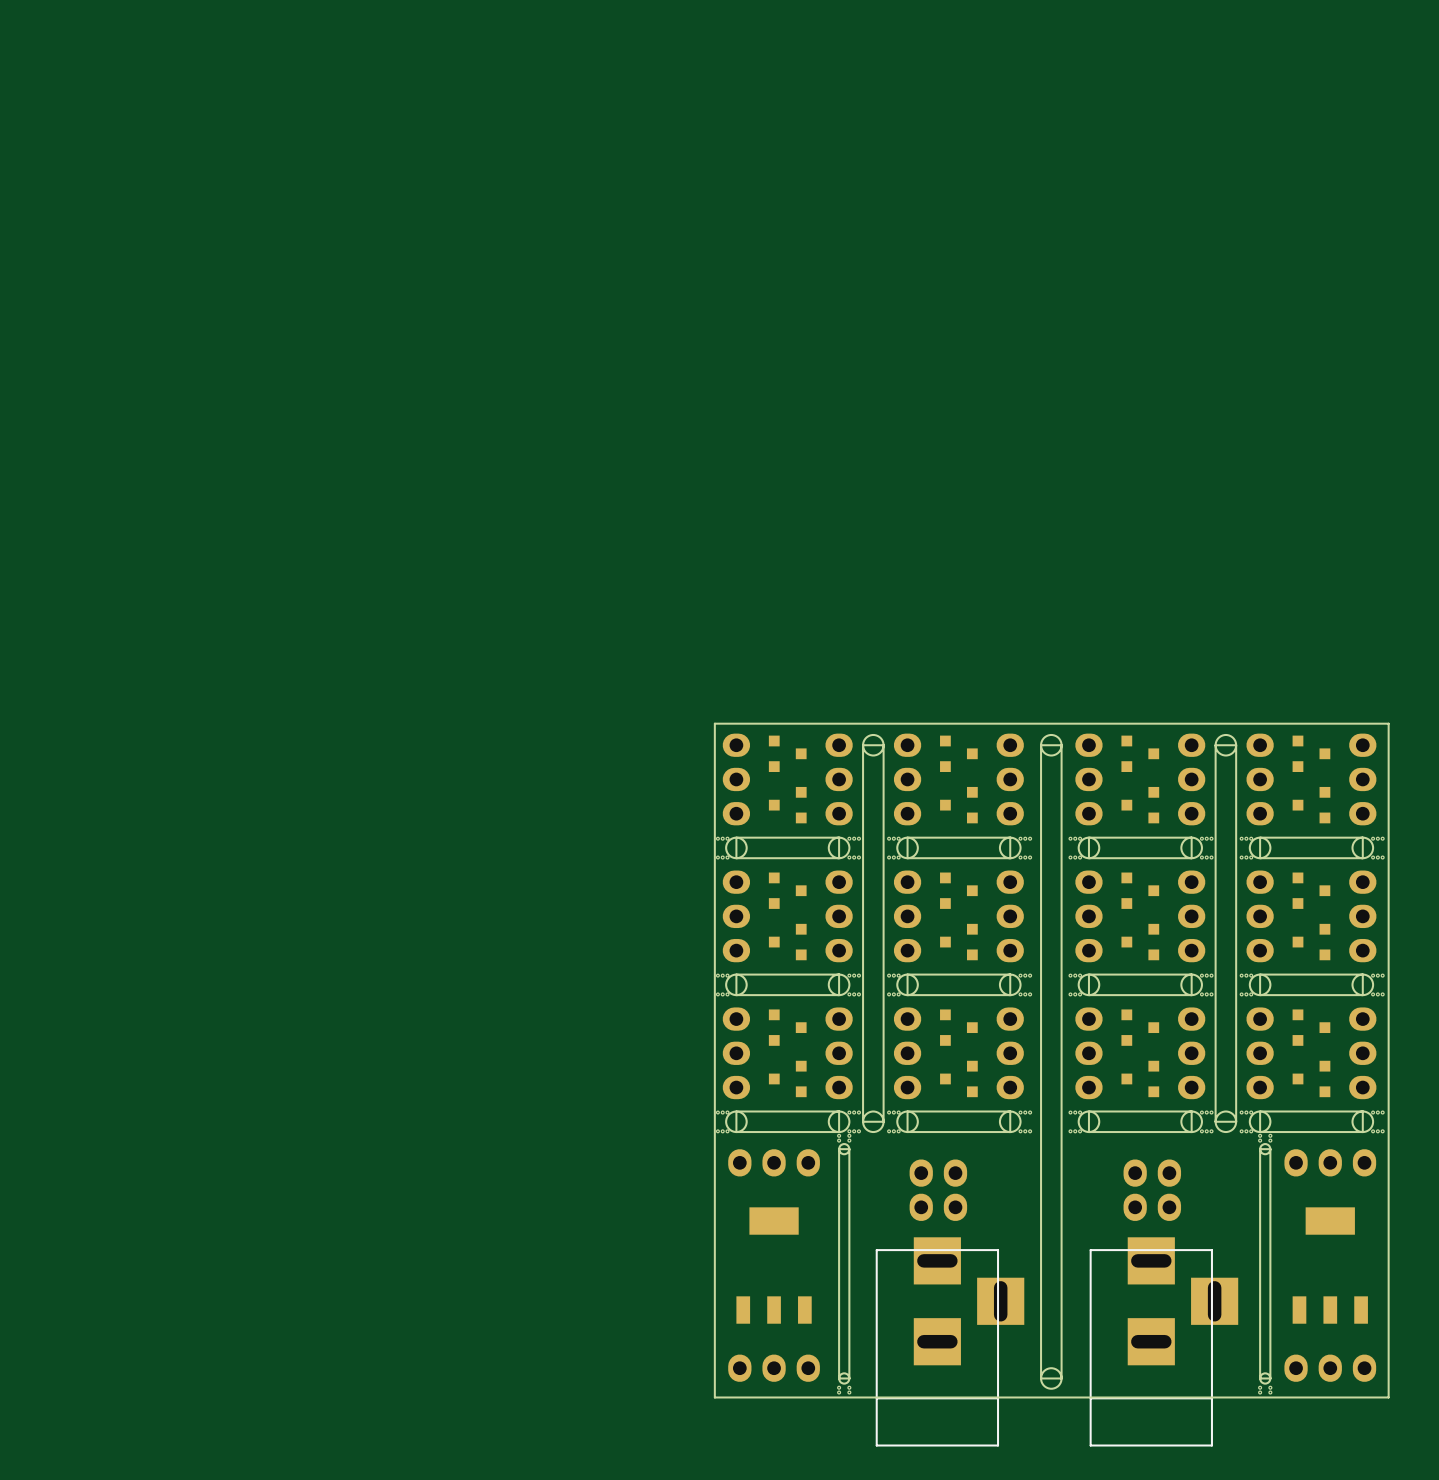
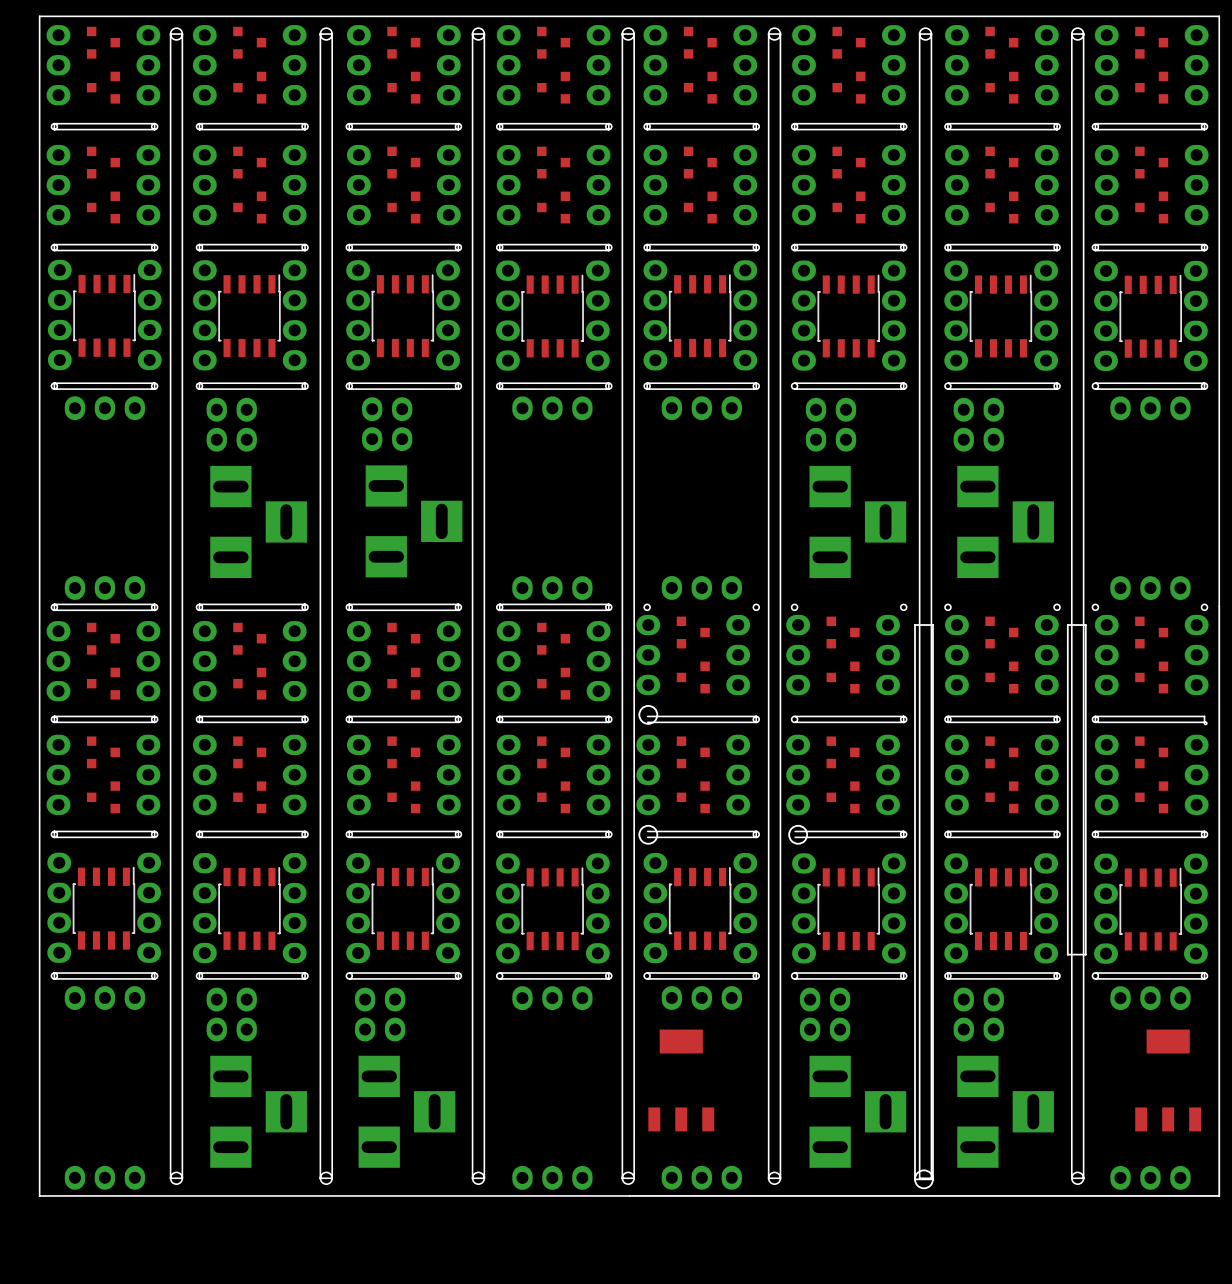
round board edge: none -> [169, 27, 183, 41]
round board edge: none -> [319, 27, 333, 41]
round board edge: none -> [471, 27, 485, 41]
round board edge: none -> [621, 27, 635, 41]
round board edge: none -> [768, 27, 782, 41]
round board edge: none -> [919, 27, 933, 41]
round board edge: none -> [1071, 27, 1085, 41]
board edge: none -> (170, 34) (182, 34) (182, 1178) (170, 1178) (170, 34)
board edge: none -> (320, 34) (332, 34) (332, 1178) (320, 1178) (320, 34)
board edge: none -> (472, 34) (484, 34) (484, 1178) (472, 1178) (472, 34)
board edge: none -> (622, 34) (634, 34) (634, 1178) (622, 1178) (622, 34)
board edge: none -> (768, 34) (780, 34) (780, 1178) (768, 1178) (768, 34)
board edge: none -> (919, 34) (931, 34) (931, 1178) (919, 1178) (919, 34)
board edge: none -> (1071, 34) (1083, 34) (1083, 1178) (1071, 1178) (1071, 34)
part: none -> (103, 42)
part: none -> (249, 42)
part: none -> (403, 42)
part: none -> (553, 42)
part: none -> (700, 42)
part: none -> (848, 42)
part: none -> (1001, 42)
part: none -> (1151, 42)
part: none -> (58, 65)
part: none -> (148, 65)
part: none -> (204, 65)
part: none -> (294, 65)
part: none -> (358, 65)
part: none -> (448, 65)
part: none -> (508, 65)
part: none -> (598, 65)
part: none -> (655, 65)
part: none -> (745, 65)
part: none -> (804, 65)
part: none -> (893, 65)
part: none -> (956, 65)
part: none -> (1046, 65)
part: none -> (1106, 65)
part: none -> (1196, 65)
part: none -> (103, 87)
part: none -> (249, 87)
part: none -> (403, 87)
part: none -> (553, 87)
part: none -> (700, 87)
part: none -> (848, 87)
part: none -> (1001, 87)
part: none -> (1151, 87)
round board edge: none -> [50, 123, 58, 131]
round board edge: none -> [151, 123, 159, 131]
round board edge: none -> [195, 123, 204, 131]
round board edge: none -> [301, 123, 309, 131]
round board edge: none -> [345, 123, 353, 131]
round board edge: none -> [454, 123, 462, 131]
round board edge: none -> [496, 123, 504, 131]
round board edge: none -> [605, 123, 613, 131]
round board edge: none -> [643, 123, 651, 131]
round board edge: none -> [752, 123, 760, 131]
round board edge: none -> [791, 123, 799, 131]
round board edge: none -> [900, 123, 908, 131]
round board edge: none -> [944, 123, 952, 131]
round board edge: none -> [1053, 123, 1061, 131]
round board edge: none -> [1091, 123, 1099, 131]
round board edge: none -> [1200, 123, 1209, 131]
board edge: none -> (54, 123) (154, 123) (154, 129) (54, 129) (54, 123)
board edge: none -> (199, 123) (305, 123) (305, 129) (199, 129) (199, 123)
board edge: none -> (349, 123) (349, 129)
board edge: none -> (349, 123) (458, 123) (458, 129) (349, 129)
board edge: none -> (499, 123) (499, 129)
board edge: none -> (500, 123) (608, 123) (608, 129) (500, 129)
board edge: none -> (647, 123) (647, 129)
board edge: none -> (647, 123) (756, 123) (756, 129) (647, 129)
board edge: none -> (794, 123) (794, 129)
board edge: none -> (795, 123) (903, 123) (903, 129) (795, 129)
board edge: none -> (947, 123) (947, 129)
board edge: none -> (948, 123) (1057, 123) (1057, 129) (948, 129)
board edge: none -> (1095, 123) (1095, 129)
board edge: none -> (1095, 123) (1204, 123) (1204, 129) (1095, 129)
part: none -> (103, 162)
part: none -> (249, 162)
part: none -> (403, 162)
part: none -> (553, 162)
part: none -> (700, 162)
part: none -> (848, 162)
part: none -> (1001, 162)
part: none -> (1151, 162)
part: none -> (58, 185)
part: none -> (148, 185)
part: none -> (204, 185)
part: none -> (294, 185)
part: none -> (358, 185)
part: none -> (448, 185)
part: none -> (508, 185)
part: none -> (598, 185)
part: none -> (655, 185)
part: none -> (745, 185)
part: none -> (804, 185)
part: none -> (893, 185)
part: none -> (956, 185)
part: none -> (1046, 185)
part: none -> (1106, 185)
part: none -> (1196, 185)
part: none -> (103, 207)
part: none -> (249, 207)
part: none -> (403, 207)
part: none -> (553, 207)
part: none -> (700, 207)
part: none -> (848, 207)
part: none -> (1001, 207)
part: none -> (1151, 207)
round board edge: none -> [50, 244, 58, 252]
round board edge: none -> [151, 244, 159, 252]
round board edge: none -> [195, 244, 204, 252]
round board edge: none -> [301, 244, 309, 252]
round board edge: none -> [345, 244, 353, 252]
round board edge: none -> [454, 244, 462, 252]
round board edge: none -> [496, 244, 504, 252]
round board edge: none -> [605, 244, 613, 252]
round board edge: none -> [643, 244, 651, 252]
round board edge: none -> [752, 244, 760, 252]
round board edge: none -> [791, 244, 799, 252]
round board edge: none -> [900, 244, 908, 252]
round board edge: none -> [944, 244, 952, 252]
round board edge: none -> [1053, 244, 1061, 252]
round board edge: none -> [1091, 244, 1099, 252]
round board edge: none -> [1200, 244, 1209, 252]
board edge: none -> (54, 244) (54, 250) (154, 250) (154, 244) (54, 244)
board edge: none -> (199, 244) (199, 250) (305, 250) (305, 244) (199, 244)
board edge: none -> (349, 244) (349, 250)
board edge: none -> (349, 244) (458, 244) (458, 250) (349, 250)
board edge: none -> (499, 244) (499, 250)
board edge: none -> (500, 244) (608, 244) (608, 250) (500, 250)
board edge: none -> (647, 244) (647, 250)
board edge: none -> (647, 244) (756, 244) (756, 250) (647, 250)
board edge: none -> (794, 244) (794, 250)
board edge: none -> (795, 244) (903, 244) (903, 250) (795, 250)
board edge: none -> (947, 244) (947, 250)
board edge: none -> (948, 244) (1057, 244) (1057, 250) (948, 250)
board edge: none -> (1095, 244) (1095, 250)
board edge: none -> (1095, 244) (1204, 244) (1204, 250) (1095, 250)
part: none -> (59, 315)
part: none -> (104, 315)
part: none -> (149, 315)
part: none -> (204, 315)
part: none -> (249, 315)
part: none -> (294, 315)
part: none -> (358, 315)
part: none -> (402, 315)
part: none -> (448, 315)
part: none -> (507, 315)
part: none -> (597, 315)
part: none -> (655, 315)
part: none -> (700, 315)
part: none -> (745, 315)
part: none -> (804, 315)
part: none -> (893, 315)
part: none -> (956, 315)
part: none -> (1046, 315)
part: none -> (552, 316)
part: none -> (848, 316)
part: none -> (1000, 316)
part: none -> (1106, 315)
part: none -> (1150, 316)
part: none -> (1195, 315)
round board edge: none -> [50, 382, 58, 390]
board edge: none -> (54, 383) (54, 389) (154, 389) (154, 383) (54, 383)
round board edge: none -> [151, 382, 159, 390]
round board edge: none -> [195, 382, 204, 390]
board edge: none -> (199, 383) (199, 389) (305, 389) (305, 383) (199, 383)
round board edge: none -> [301, 382, 309, 390]
round board edge: none -> [345, 382, 353, 390]
board edge: none -> (349, 383) (349, 389)
board edge: none -> (349, 383) (458, 383) (458, 389) (349, 389)
round board edge: none -> [454, 382, 462, 390]
round board edge: none -> [496, 382, 504, 390]
board edge: none -> (499, 383) (499, 389)
board edge: none -> (500, 383) (608, 383) (608, 389) (500, 389)
round board edge: none -> [605, 382, 613, 390]
round board edge: none -> [643, 382, 651, 390]
board edge: none -> (647, 383) (647, 389)
board edge: none -> (647, 383) (756, 383) (756, 389) (647, 389)
round board edge: none -> [752, 382, 760, 390]
round board edge: none -> [791, 382, 799, 390]
board edge: none -> (795, 383) (903, 383) (903, 389) (795, 389)
round board edge: none -> [900, 382, 908, 390]
round board edge: none -> [944, 382, 952, 390]
board edge: none -> (948, 383) (1057, 383) (1057, 389) (948, 389)
round board edge: none -> [1053, 382, 1061, 390]
round board edge: none -> [1091, 382, 1099, 390]
board edge: none -> (1095, 383) (1204, 383) (1204, 389) (1095, 389)
round board edge: none -> [1200, 382, 1209, 390]
part: none -> (104, 408)
part: none -> (552, 408)
part: none -> (701, 408)
part: none -> (1150, 408)
part: none -> (387, 409)
part: none -> (231, 409)
part: none -> (831, 409)
part: none -> (978, 409)
part: none -> (387, 439)
part: none -> (231, 439)
part: none -> (831, 439)
part: none -> (978, 439)
part: none -> (414, 521)
part: none -> (258, 521)
part: none -> (857, 521)
part: none -> (1005, 521)
part: none -> (104, 587)
part: none -> (701, 587)
part: none -> (552, 588)
part: none -> (1150, 588)
round board edge: none -> [50, 603, 58, 611]
round board edge: none -> [151, 603, 159, 611]
round board edge: none -> [195, 603, 204, 611]
round board edge: none -> [301, 603, 309, 611]
round board edge: none -> [345, 603, 353, 611]
round board edge: none -> [454, 603, 462, 611]
round board edge: none -> [496, 603, 504, 611]
round board edge: none -> [605, 603, 613, 611]
round board edge: none -> [643, 603, 651, 611]
round board edge: none -> [752, 603, 760, 611]
round board edge: none -> [791, 603, 799, 611]
round board edge: none -> [900, 603, 908, 611]
round board edge: none -> [944, 603, 952, 611]
round board edge: none -> [1053, 603, 1061, 611]
round board edge: none -> [1091, 603, 1099, 611]
round board edge: none -> [1200, 603, 1209, 611]
board edge: none -> (54, 604) (54, 610) (154, 610) (154, 604) (54, 604)
board edge: none -> (199, 604) (199, 610) (305, 610) (305, 604) (199, 604)
board edge: none -> (349, 604) (349, 610)
board edge: none -> (349, 604) (458, 604) (458, 610) (349, 610)
board edge: none -> (499, 604) (499, 610)
board edge: none -> (500, 604) (608, 604) (608, 610) (500, 610)
board edge: (1388, 723) (714, 723) (714, 1397) -> (1219, 606) (1219, 16) (39, 16) (39, 1195) (629, 1195)
round board edge: [862, 733, 885, 757] -> none
round board edge: [1040, 733, 1063, 757] -> none
round board edge: [1214, 733, 1238, 757] -> none
board edge: (863, 745) (883, 745) (883, 1121) (863, 1121) (863, 745) -> none
part: none -> (103, 638)
part: none -> (249, 638)
part: none -> (403, 638)
part: none -> (553, 638)
part: none -> (58, 661)
part: none -> (148, 661)
part: none -> (204, 661)
part: none -> (294, 661)
part: none -> (358, 661)
part: none -> (448, 661)
part: none -> (508, 661)
part: none -> (598, 661)
part: none -> (103, 683)
part: none -> (249, 683)
part: none -> (403, 683)
part: none -> (553, 683)
round board edge: [716, 836, 720, 841] -> none
round board edge: [720, 836, 725, 841] -> none
round board edge: [725, 836, 730, 841] -> none
round board edge: [827, 836, 851, 860] -> none
round board edge: [847, 836, 852, 841] -> none
round board edge: [852, 836, 856, 841] -> none
round board edge: [857, 836, 861, 841] -> none
round board edge: [887, 836, 891, 841] -> none
round board edge: [892, 836, 896, 841] -> none
round board edge: [896, 836, 901, 841] -> none
round board edge: [896, 836, 919, 860] -> none
round board edge: [998, 836, 1022, 860] -> none
round board edge: [1018, 836, 1023, 841] -> none
round board edge: [1023, 836, 1028, 841] -> none
round board edge: [1028, 836, 1032, 841] -> none
round board edge: [1068, 836, 1073, 841] -> none
round board edge: [1073, 836, 1078, 841] -> none
round board edge: [1077, 836, 1101, 860] -> none
round board edge: [1078, 836, 1082, 841] -> none
round board edge: [1180, 836, 1203, 860] -> none
round board edge: [1200, 836, 1204, 841] -> none
round board edge: [1204, 836, 1209, 841] -> none
round board edge: [1209, 836, 1214, 841] -> none
round board edge: [1239, 836, 1244, 841] -> none
round board edge: [1244, 836, 1249, 841] -> none
round board edge: [1248, 836, 1272, 860] -> none
round board edge: [1249, 836, 1253, 841] -> none
round board edge: [1351, 836, 1375, 860] -> none
round board edge: [1371, 836, 1375, 841] -> none
round board edge: [1376, 836, 1380, 841] -> none
round board edge: [1380, 836, 1385, 841] -> none
board edge: (736, 837) (839, 837) (839, 858) (736, 858) (736, 837) -> none
board edge: (907, 837) (1010, 837) (1010, 858) (907, 858) (907, 837) -> none
board edge: (1088, 837) (1191, 837) (1191, 858) (1088, 858) (1088, 837) -> none
board edge: (1260, 837) (1260, 858) (1362, 858) (1362, 837) (1260, 837) -> none
round board edge: none -> [50, 715, 58, 723]
board edge: none -> (54, 716) (54, 722) (154, 722) (154, 716) (54, 716)
round board edge: none -> [151, 715, 159, 723]
round board edge: none -> [195, 715, 204, 723]
board edge: none -> (199, 716) (199, 722) (305, 722) (305, 716) (199, 716)
round board edge: none -> [301, 715, 309, 723]
round board edge: none -> [345, 715, 353, 723]
board edge: none -> (349, 716) (349, 722)
board edge: none -> (349, 716) (458, 716) (458, 722) (349, 722)
round board edge: none -> [454, 715, 462, 723]
round board edge: none -> [496, 715, 504, 723]
board edge: none -> (499, 716) (499, 722)
board edge: none -> (500, 716) (608, 716) (608, 722) (500, 722)
round board edge: none -> [605, 715, 613, 723]
board edge: none -> (647, 716) (756, 716) (756, 722) (647, 722)
round board edge: none -> [752, 715, 760, 723]
round board edge: none -> [791, 715, 799, 723]
board edge: none -> (795, 716) (903, 716) (903, 722) (795, 722)
round board edge: none -> [900, 715, 908, 723]
round board edge: none -> [944, 715, 952, 723]
board edge: none -> (947, 716) (947, 722)
board edge: none -> (948, 716) (1057, 716) (1057, 722) (948, 722)
round board edge: none -> [1053, 715, 1061, 723]
round board edge: none -> [1091, 715, 1099, 723]
board edge: none -> (1095, 716) (1095, 722)
board edge: none -> (1095, 716) (1204, 716) (1204, 722) (1095, 722)
round board edge: [716, 855, 720, 860] -> none
round board edge: [720, 855, 725, 860] -> none
round board edge: [725, 855, 730, 860] -> none
round board edge: [847, 855, 852, 860] -> none
round board edge: [852, 855, 856, 860] -> none
round board edge: [857, 855, 861, 860] -> none
round board edge: [887, 855, 891, 860] -> none
round board edge: [892, 855, 896, 860] -> none
round board edge: [896, 855, 901, 860] -> none
round board edge: [1018, 855, 1023, 860] -> none
round board edge: [1023, 855, 1028, 860] -> none
round board edge: [1028, 855, 1032, 860] -> none
round board edge: [1068, 855, 1073, 860] -> none
round board edge: [1073, 855, 1078, 860] -> none
round board edge: [1078, 855, 1082, 860] -> none
round board edge: [1200, 855, 1204, 860] -> none
round board edge: [1204, 855, 1209, 860] -> none
round board edge: [1209, 855, 1214, 860] -> none
round board edge: [1239, 855, 1244, 860] -> none
round board edge: [1244, 855, 1249, 860] -> none
round board edge: [1249, 855, 1253, 860] -> none
round board edge: [1376, 855, 1380, 860] -> none
round board edge: [1380, 855, 1385, 860] -> none
part: none -> (103, 752)
part: none -> (249, 752)
part: none -> (403, 752)
part: none -> (553, 752)
part: none -> (58, 774)
part: none -> (148, 774)
part: none -> (204, 774)
part: none -> (294, 774)
part: none -> (358, 774)
part: none -> (448, 774)
part: none -> (508, 774)
part: none -> (598, 774)
part: none -> (103, 797)
part: none -> (249, 797)
part: none -> (403, 797)
part: none -> (553, 797)
round board edge: [716, 973, 720, 978] -> none
round board edge: [720, 973, 725, 978] -> none
round board edge: [725, 973, 730, 978] -> none
round board edge: [827, 973, 851, 997] -> none
round board edge: [847, 973, 852, 978] -> none
round board edge: [852, 973, 856, 978] -> none
round board edge: [857, 973, 861, 978] -> none
round board edge: [887, 973, 891, 978] -> none
round board edge: [892, 973, 896, 978] -> none
round board edge: [896, 973, 901, 978] -> none
round board edge: [998, 973, 1022, 997] -> none
round board edge: [1018, 973, 1023, 978] -> none
round board edge: [1023, 973, 1028, 978] -> none
round board edge: [1028, 973, 1032, 978] -> none
round board edge: [1068, 973, 1073, 978] -> none
round board edge: [1073, 973, 1078, 978] -> none
round board edge size: [1077, 973, 1101, 997] -> [944, 830, 952, 838]
round board edge: [1078, 973, 1082, 978] -> none
round board edge size: [1180, 973, 1203, 997] -> [1053, 830, 1061, 838]
round board edge: [1200, 973, 1204, 978] -> none
round board edge: [1204, 973, 1209, 978] -> none
round board edge: [1209, 973, 1214, 978] -> none
round board edge: [1239, 973, 1244, 978] -> none
round board edge: [1244, 973, 1249, 978] -> none
round board edge size: [1248, 973, 1272, 997] -> [1091, 830, 1099, 838]
round board edge: [1249, 973, 1253, 978] -> none
round board edge size: [1351, 973, 1375, 997] -> [1200, 830, 1209, 838]
round board edge: [1371, 973, 1375, 978] -> none
round board edge: [1376, 973, 1380, 978] -> none
round board edge: [1380, 973, 1385, 978] -> none
board edge: (736, 974) (839, 974) (839, 995) (736, 995) (736, 974) -> none
board edge: (907, 974) (1010, 974) (1010, 995) (907, 995) (907, 974) -> none
board edge: (1088, 974) (1191, 974) (1191, 995) (1088, 995) (1088, 974) -> none
board edge: (1260, 974) (1362, 974) (1362, 995) (1260, 995) (1260, 974) -> none
round board edge: none -> [50, 830, 58, 838]
round board edge: none -> [151, 830, 159, 838]
round board edge: none -> [195, 830, 204, 838]
round board edge: none -> [301, 830, 309, 838]
round board edge: none -> [345, 830, 353, 838]
round board edge: none -> [454, 830, 462, 838]
round board edge: none -> [496, 830, 504, 838]
round board edge: none -> [605, 830, 613, 838]
round board edge: none -> [752, 830, 760, 838]
round board edge: none -> [900, 830, 908, 838]
board edge: none -> (54, 831) (54, 837) (154, 837) (154, 831) (54, 831)
board edge: none -> (199, 831) (199, 837) (305, 837) (305, 831) (199, 831)
board edge: none -> (349, 831) (349, 837)
board edge: none -> (349, 831) (458, 831) (458, 837) (349, 837)
board edge: none -> (499, 831) (499, 837)
board edge: none -> (500, 831) (608, 831) (608, 837) (500, 837)
board edge: none -> (647, 831) (756, 831) (756, 837) (647, 837)
board edge: none -> (795, 831) (903, 831) (903, 837) (795, 837)
board edge: none -> (947, 831) (947, 837)
board edge: none -> (948, 831) (1057, 831) (1057, 837) (948, 837)
board edge: none -> (1095, 831) (1095, 837)
board edge: none -> (1095, 831) (1204, 831) (1204, 837) (1095, 837)
round board edge: [716, 992, 720, 997] -> none
round board edge: [720, 992, 725, 997] -> none
round board edge: [725, 992, 730, 997] -> none
round board edge: [847, 992, 852, 997] -> none
round board edge: [852, 992, 856, 997] -> none
round board edge: [857, 992, 861, 997] -> none
round board edge: [887, 992, 891, 997] -> none
round board edge: [892, 992, 896, 997] -> none
round board edge: [896, 992, 901, 997] -> none
round board edge: [1018, 992, 1023, 997] -> none
round board edge: [1023, 992, 1028, 997] -> none
round board edge: [1028, 992, 1032, 997] -> none
round board edge: [1068, 992, 1073, 997] -> none
round board edge: [1073, 992, 1078, 997] -> none
round board edge: [1078, 992, 1082, 997] -> none
round board edge: [1200, 992, 1204, 997] -> none
round board edge: [1204, 992, 1209, 997] -> none
round board edge: [1209, 992, 1214, 997] -> none
round board edge: [1239, 992, 1244, 997] -> none
round board edge: [1244, 992, 1249, 997] -> none
round board edge: [1249, 992, 1253, 997] -> none
round board edge: [1371, 992, 1375, 997] -> none
round board edge: [1376, 992, 1380, 997] -> none
round board edge: [1380, 992, 1385, 997] -> none
part: (787, 1027) -> none
part: (958, 1027) -> none
part: (1140, 1027) -> none
part: (1311, 1027) -> none
part: (736, 1053) -> none
part: (839, 1053) -> none
part: (907, 1053) -> none
part: (1010, 1053) -> none
part: (1088, 1053) -> none
part: (1191, 1053) -> none
part: (1260, 1053) -> none
part: (1362, 1053) -> none
part footprint: [768, 1060, 807, 1098] -> [668, 867, 732, 950]
part footprint: [940, 1060, 978, 1098] -> [817, 867, 881, 951]
part footprint: [1121, 1060, 1160, 1098] -> [969, 867, 1033, 951]
part footprint: [1292, 1060, 1331, 1098] -> [1119, 867, 1182, 951]
part: none -> (59, 907)
part: none -> (103, 908)
part: none -> (149, 907)
part: none -> (204, 908)
part: none -> (294, 908)
part: none -> (358, 908)
part: none -> (448, 908)
part: none -> (507, 908)
part: none -> (597, 908)
part: none -> (655, 908)
part: none -> (745, 908)
part: none -> (804, 908)
part: none -> (893, 908)
part: none -> (956, 908)
part: none -> (1046, 908)
part: none -> (249, 908)
part: none -> (402, 908)
part: none -> (552, 908)
part: none -> (1106, 908)
part: none -> (1195, 908)
round board edge: [716, 1110, 720, 1115] -> none
round board edge: [720, 1110, 725, 1115] -> none
round board edge: [725, 1110, 730, 1115] -> none
round board edge: [725, 1110, 748, 1134] -> none
round board edge: [827, 1110, 851, 1134] -> none
round board edge: [847, 1110, 852, 1115] -> none
round board edge: [852, 1110, 856, 1115] -> none
round board edge: [857, 1110, 861, 1115] -> none
round board edge: [862, 1110, 885, 1134] -> none
round board edge: [887, 1110, 891, 1115] -> none
round board edge: [892, 1110, 896, 1115] -> none
round board edge: [896, 1110, 919, 1134] -> none
round board edge: [896, 1110, 901, 1115] -> none
round board edge: [998, 1110, 1022, 1134] -> none
round board edge: [1018, 1110, 1023, 1115] -> none
round board edge: [1023, 1110, 1028, 1115] -> none
round board edge: [1028, 1110, 1032, 1115] -> none
round board edge: [1068, 1110, 1073, 1115] -> none
round board edge: [1073, 1110, 1078, 1115] -> none
round board edge: [1077, 1110, 1101, 1134] -> none
round board edge: [1078, 1110, 1082, 1115] -> none
round board edge: [1180, 1110, 1203, 1134] -> none
round board edge: [1200, 1110, 1204, 1115] -> none
round board edge: [1204, 1110, 1209, 1115] -> none
round board edge: [1209, 1110, 1214, 1115] -> none
round board edge: [1214, 1110, 1238, 1134] -> none
round board edge: [1239, 1110, 1244, 1115] -> none
round board edge: [1244, 1110, 1249, 1115] -> none
round board edge: [1248, 1110, 1272, 1134] -> none
round board edge: [1249, 1110, 1253, 1115] -> none
round board edge: [1351, 1110, 1375, 1134] -> none
round board edge: [1371, 1110, 1375, 1115] -> none
round board edge: [1376, 1110, 1380, 1115] -> none
round board edge: [1380, 1110, 1385, 1115] -> none
board edge: (736, 1111) (839, 1111) (839, 1132) (736, 1132) (736, 1111) -> none
board edge: (907, 1111) (1010, 1111) (1010, 1132) (907, 1132) (907, 1111) -> none
board edge: (1088, 1111) (1191, 1111) (1191, 1132) (1088, 1132) (1088, 1111) -> none
board edge: (1260, 1111) (1260, 1132) (1362, 1132) (1362, 1111) (1260, 1111) -> none
round board edge: [716, 1129, 720, 1134] -> none
round board edge: [720, 1129, 725, 1134] -> none
round board edge: [725, 1129, 730, 1134] -> none
round board edge: [847, 1129, 852, 1134] -> none
round board edge: [852, 1129, 856, 1134] -> none
round board edge: [857, 1129, 861, 1134] -> none
round board edge: [887, 1129, 891, 1134] -> none
round board edge: [892, 1129, 896, 1134] -> none
round board edge: [896, 1129, 901, 1134] -> none
round board edge: [1018, 1129, 1023, 1134] -> none
round board edge: [1023, 1129, 1028, 1134] -> none
round board edge: [1028, 1129, 1032, 1134] -> none
round board edge: [1068, 1129, 1073, 1134] -> none
round board edge: [1073, 1129, 1078, 1134] -> none
round board edge: [1078, 1129, 1082, 1134] -> none
round board edge: [1200, 1129, 1204, 1134] -> none
round board edge: [1204, 1129, 1209, 1134] -> none
round board edge: [1209, 1129, 1214, 1134] -> none
round board edge: [1239, 1129, 1244, 1134] -> none
round board edge: [1244, 1129, 1249, 1134] -> none
round board edge: [1249, 1129, 1253, 1134] -> none
round board edge: [1371, 1129, 1375, 1134] -> none
round board edge: [1376, 1129, 1380, 1134] -> none
round board edge: [1380, 1129, 1385, 1134] -> none
round board edge: [837, 1134, 841, 1138] -> none
round board edge: [847, 1134, 852, 1138] -> none
round board edge: [1258, 1134, 1262, 1138] -> none
round board edge: [1268, 1134, 1273, 1138] -> none
round board edge: [837, 1138, 841, 1143] -> none
round board edge: [847, 1138, 852, 1143] -> none
round board edge: [1258, 1138, 1262, 1143] -> none
round board edge: [1268, 1138, 1273, 1143] -> none
round board edge: none -> [50, 972, 58, 980]
board edge: none -> (54, 973) (54, 978) (154, 978) (154, 973) (54, 973)
round board edge: none -> [151, 972, 159, 980]
round board edge: none -> [195, 972, 204, 980]
board edge: none -> (199, 973) (199, 978) (305, 978) (305, 973) (199, 973)
round board edge: none -> [301, 972, 309, 980]
round board edge: none -> [345, 972, 353, 980]
board edge: none -> (349, 973) (458, 973) (458, 978) (349, 978)
round board edge: none -> [454, 972, 462, 980]
round board edge: none -> [496, 972, 504, 980]
board edge: none -> (500, 973) (608, 973) (608, 978) (500, 978)
round board edge: none -> [605, 972, 613, 980]
round board edge: none -> [643, 972, 651, 980]
board edge: none -> (647, 973) (756, 973) (756, 978) (647, 978)
round board edge: none -> [752, 972, 760, 980]
round board edge: none -> [791, 972, 799, 980]
board edge: none -> (795, 973) (903, 973) (903, 978) (795, 978)
round board edge: none -> [900, 972, 908, 980]
round board edge: none -> [944, 972, 952, 980]
board edge: none -> (947, 973) (947, 978)
board edge: none -> (948, 973) (1057, 973) (1057, 978) (948, 978)
round board edge: none -> [1053, 972, 1061, 980]
round board edge: none -> [1091, 972, 1099, 980]
board edge: none -> (1095, 973) (1204, 973) (1204, 978) (1095, 978)
round board edge: none -> [1200, 972, 1209, 980]
round board edge: [838, 1143, 851, 1156] -> none
round board edge: [1259, 1143, 1272, 1156] -> none
board edge: (839, 1149) (849, 1149) (849, 1378) (839, 1378) (839, 1149) -> none
board edge: (1260, 1149) (1260, 1378) (1270, 1378) (1270, 1149) (1260, 1149) -> none
part position: (774, 1162) -> (701, 998)
part position: (1330, 1162) -> (1150, 998)
part: none -> (104, 998)
part: none -> (552, 998)
part: none -> (231, 999)
part: none -> (380, 999)
part: none -> (978, 999)
part: (1152, 1173) -> none
part: none -> (231, 1029)
part: none -> (380, 1029)
part: none -> (978, 1029)
part: (1152, 1207) -> none
part: none -> (258, 1111)
part: none -> (406, 1111)
part: none -> (857, 1111)
part: none -> (1005, 1111)
part: (950, 1341) -> none
part: (1163, 1341) -> none
part position: (774, 1368) -> (701, 1177)
part position: (1330, 1368) -> (1150, 1177)
round board edge: none -> [169, 1171, 183, 1185]
round board edge: none -> [319, 1171, 333, 1185]
round board edge: none -> [471, 1171, 485, 1185]
round board edge: none -> [621, 1171, 635, 1185]
round board edge: none -> [768, 1171, 782, 1185]
round board edge: none -> [1071, 1171, 1085, 1185]
round board edge: [838, 1372, 851, 1385] -> none
round board edge: [1259, 1372, 1272, 1385] -> none
part: none -> (104, 1177)
part: none -> (552, 1177)
round board edge: [837, 1385, 841, 1390] -> none
round board edge: [847, 1385, 852, 1390] -> none
round board edge: [1258, 1385, 1262, 1390] -> none
round board edge: [1268, 1385, 1273, 1390] -> none
round board edge: [837, 1390, 841, 1395] -> none
round board edge: [847, 1390, 852, 1395] -> none
round board edge: [1258, 1390, 1262, 1395] -> none
round board edge: [1268, 1390, 1273, 1395] -> none

